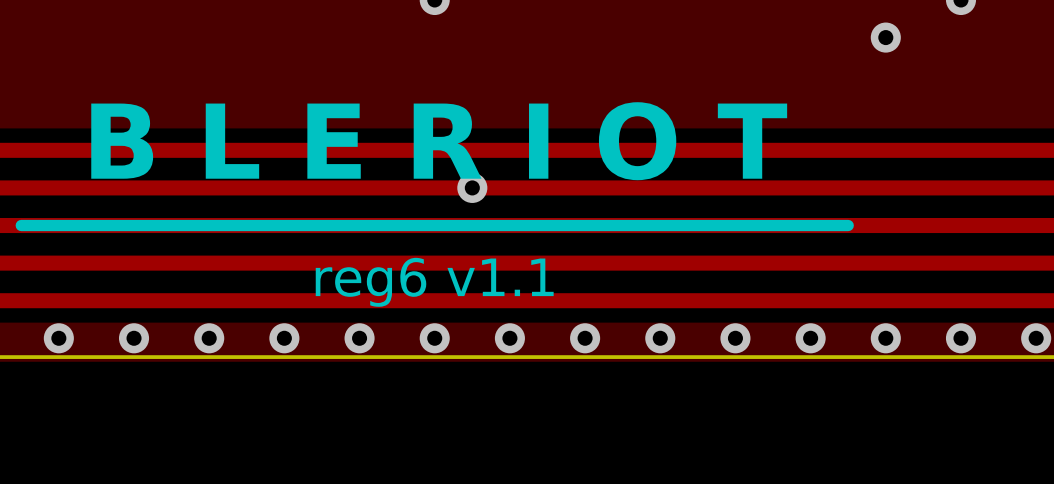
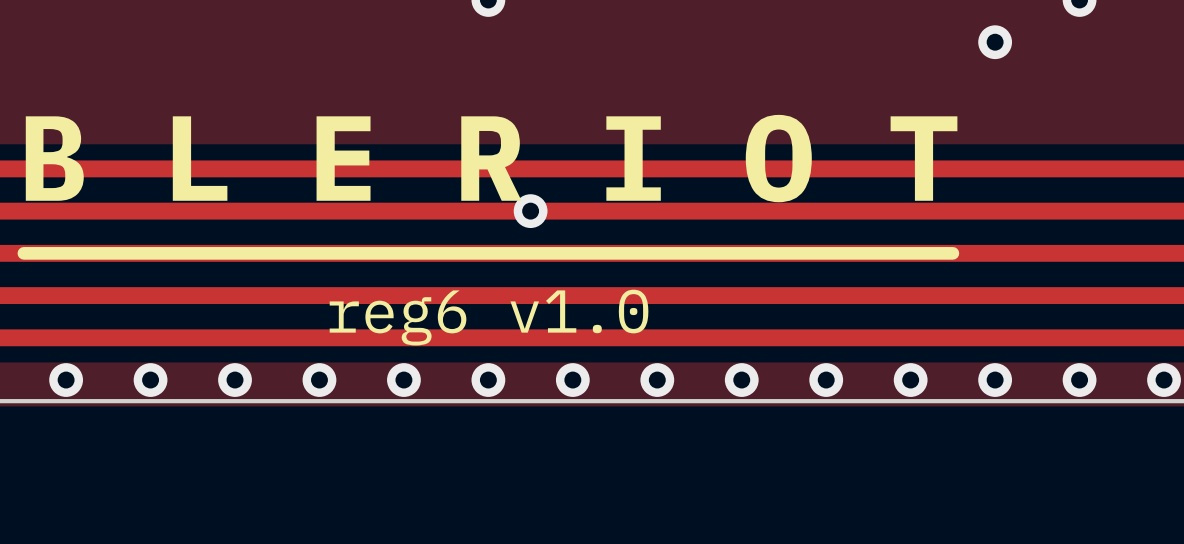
text: reg6 v1.1 (434, 282) -> reg6 v1.0 (489, 317)

